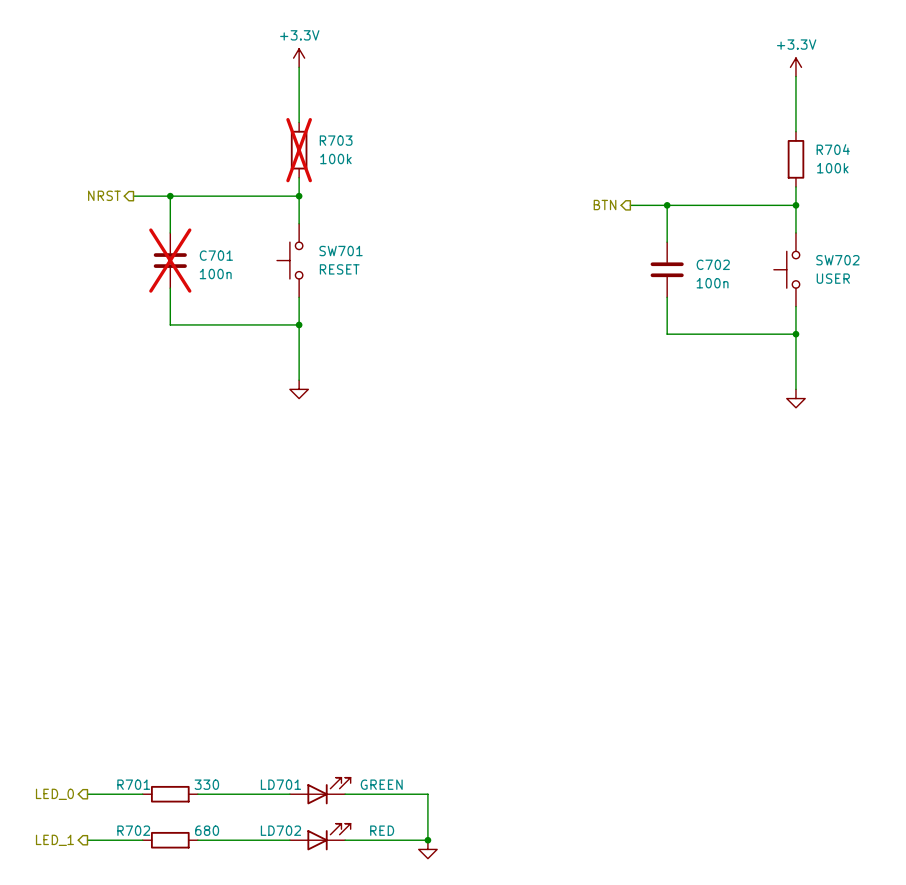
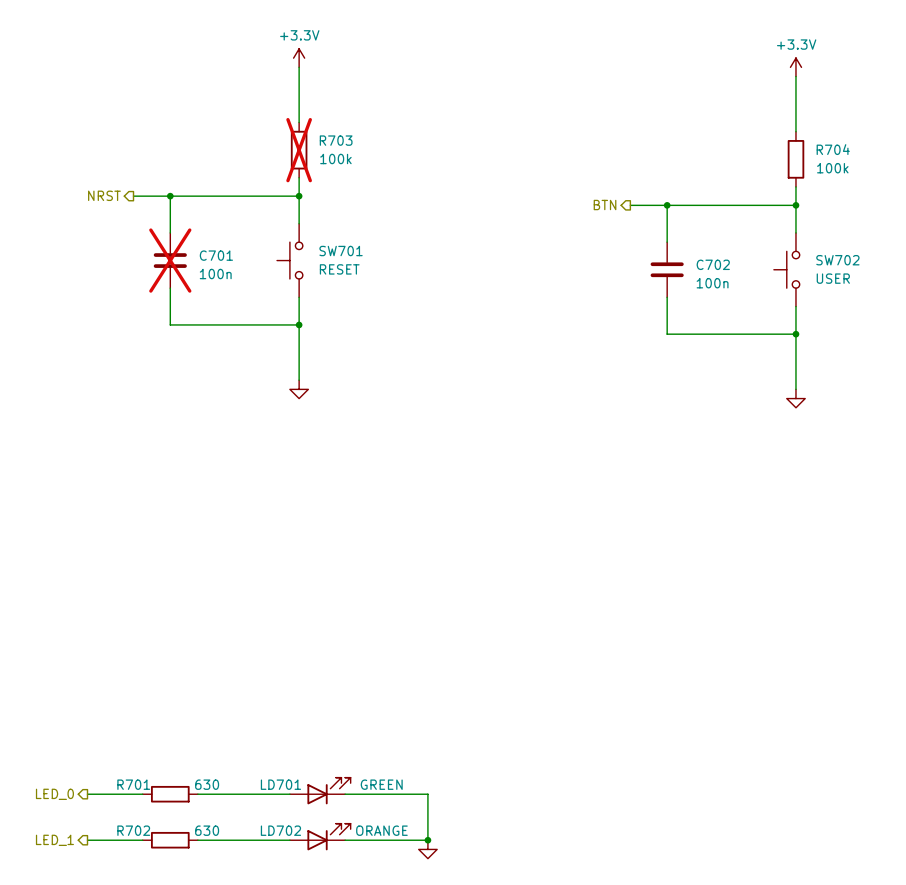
R701 value: 330 (206, 784) -> 630 (207, 784)
R702 value: 680 (207, 830) -> 630 (207, 830)
LD702 value: RED (382, 830) -> ORANGE (381, 830)

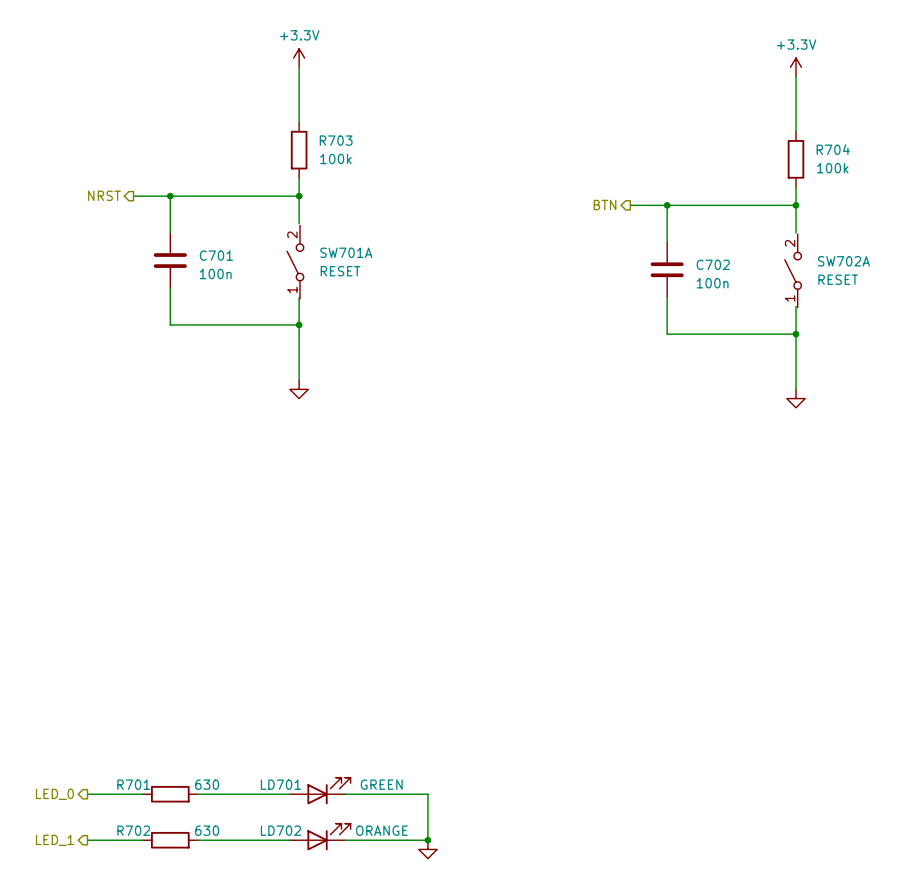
R703 do-not-place cross: (299, 150) -> none
C701 do-not-place cross: (170, 260) -> none
SW701: RESET (289, 260) -> none
SW701A: none -> RESET (295, 262)
SW702: USER (786, 269) -> none
SW702A: none -> RESET (793, 270)

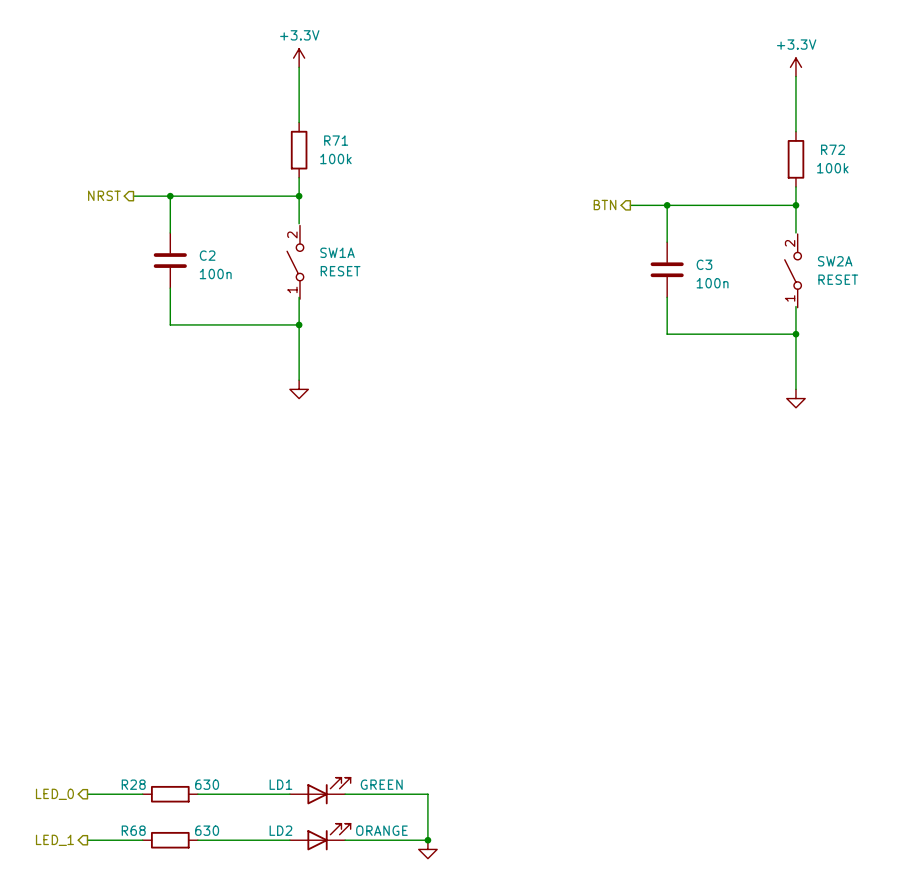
R703 name: R703 (336, 140) -> R71 (336, 140)
R704 name: R704 (833, 149) -> R72 (833, 149)
SW701A name: SW701A (346, 252) -> SW1A (337, 252)
C701 name: C701 (216, 255) -> C2 (207, 255)
SW702A name: SW702A (843, 261) -> SW2A (835, 261)
C702 name: C702 (713, 264) -> C3 (704, 264)
R701 name: R701 (133, 784) -> R28 (133, 784)
LD701 name: LD701 (280, 784) -> LD1 (280, 784)
R702 name: R702 (133, 830) -> R68 (133, 830)
LD702 name: LD702 (280, 830) -> LD2 (280, 830)

